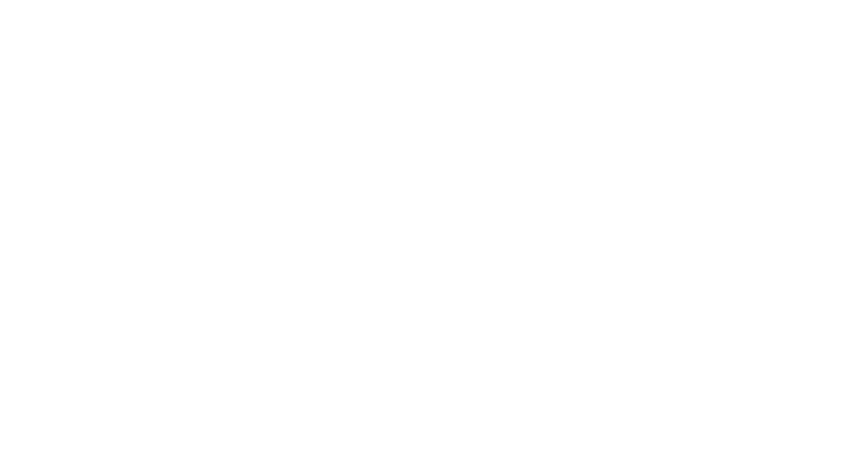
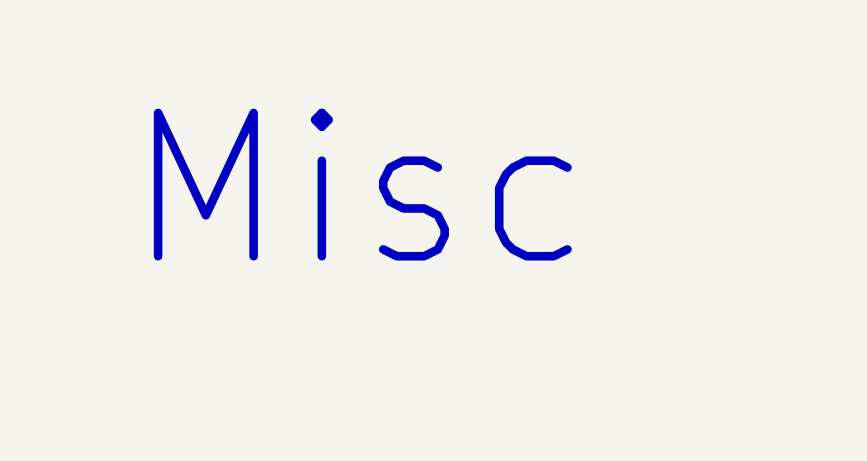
text: none -> Misc (362, 184)

